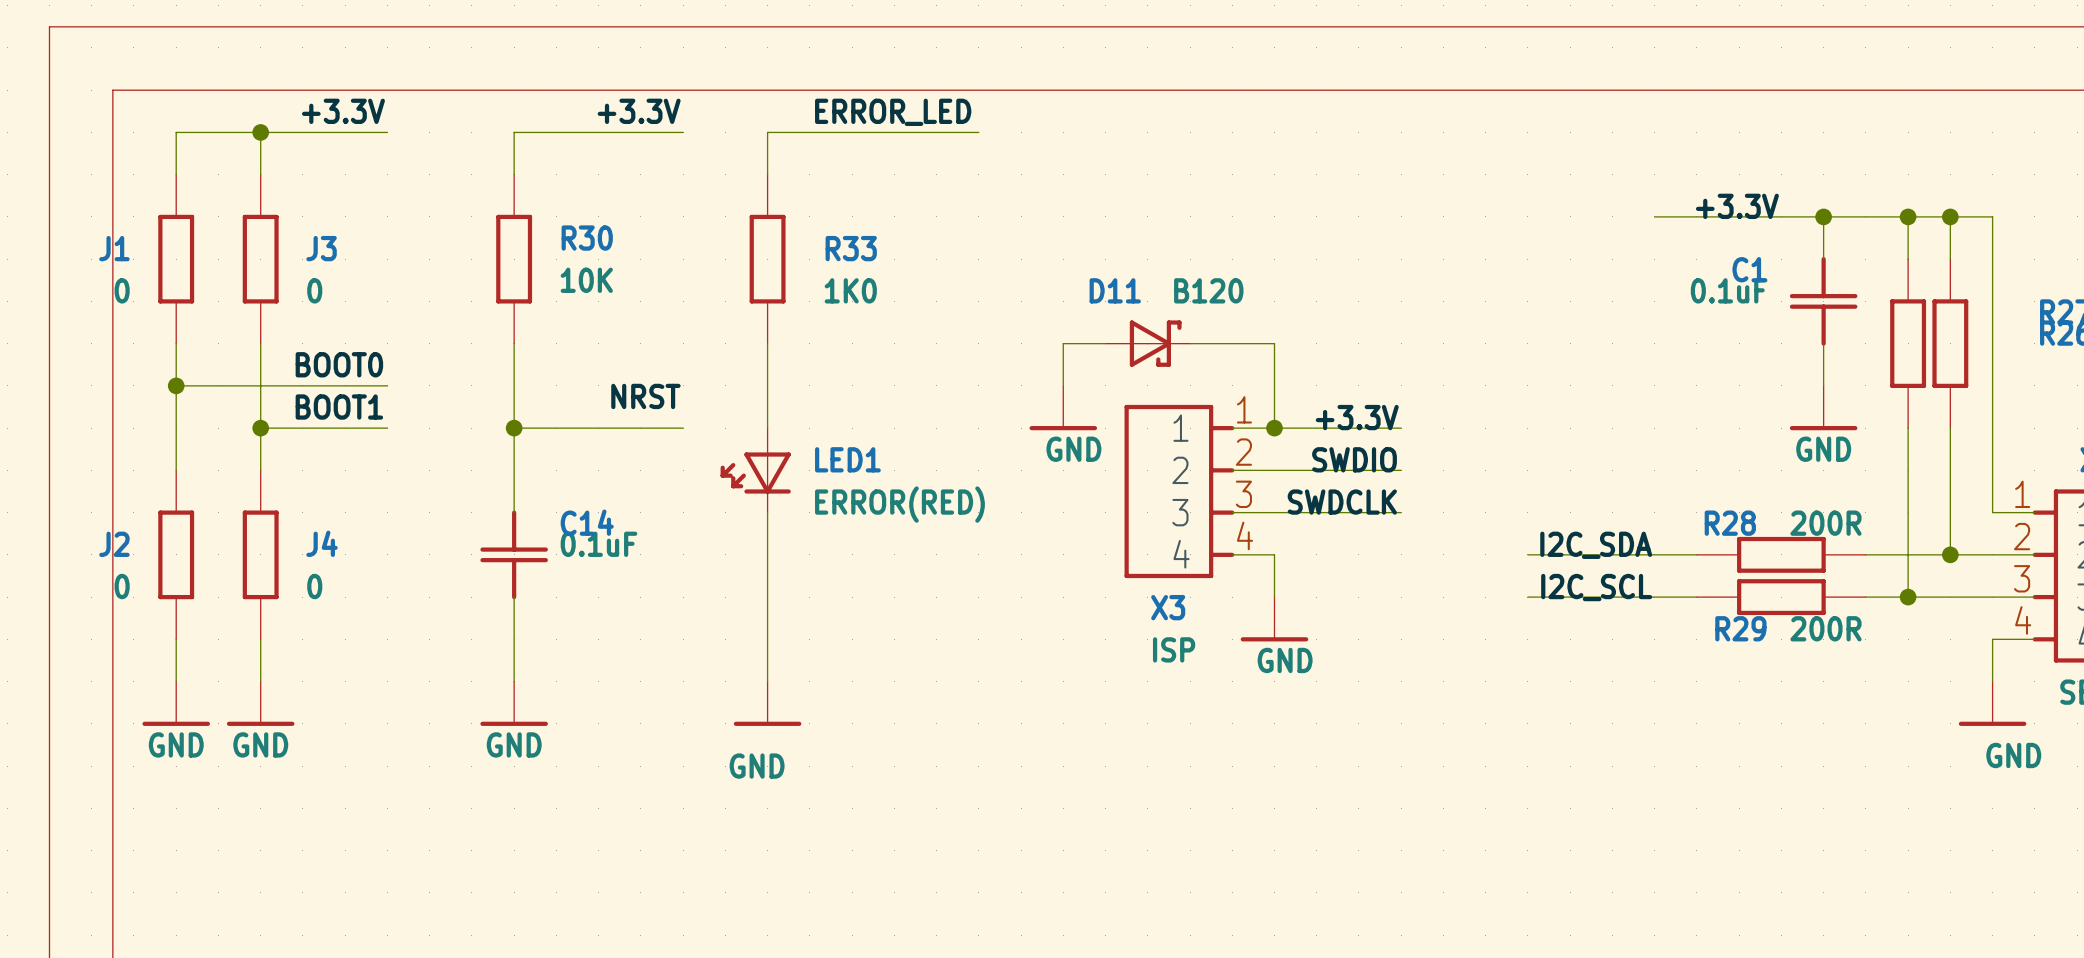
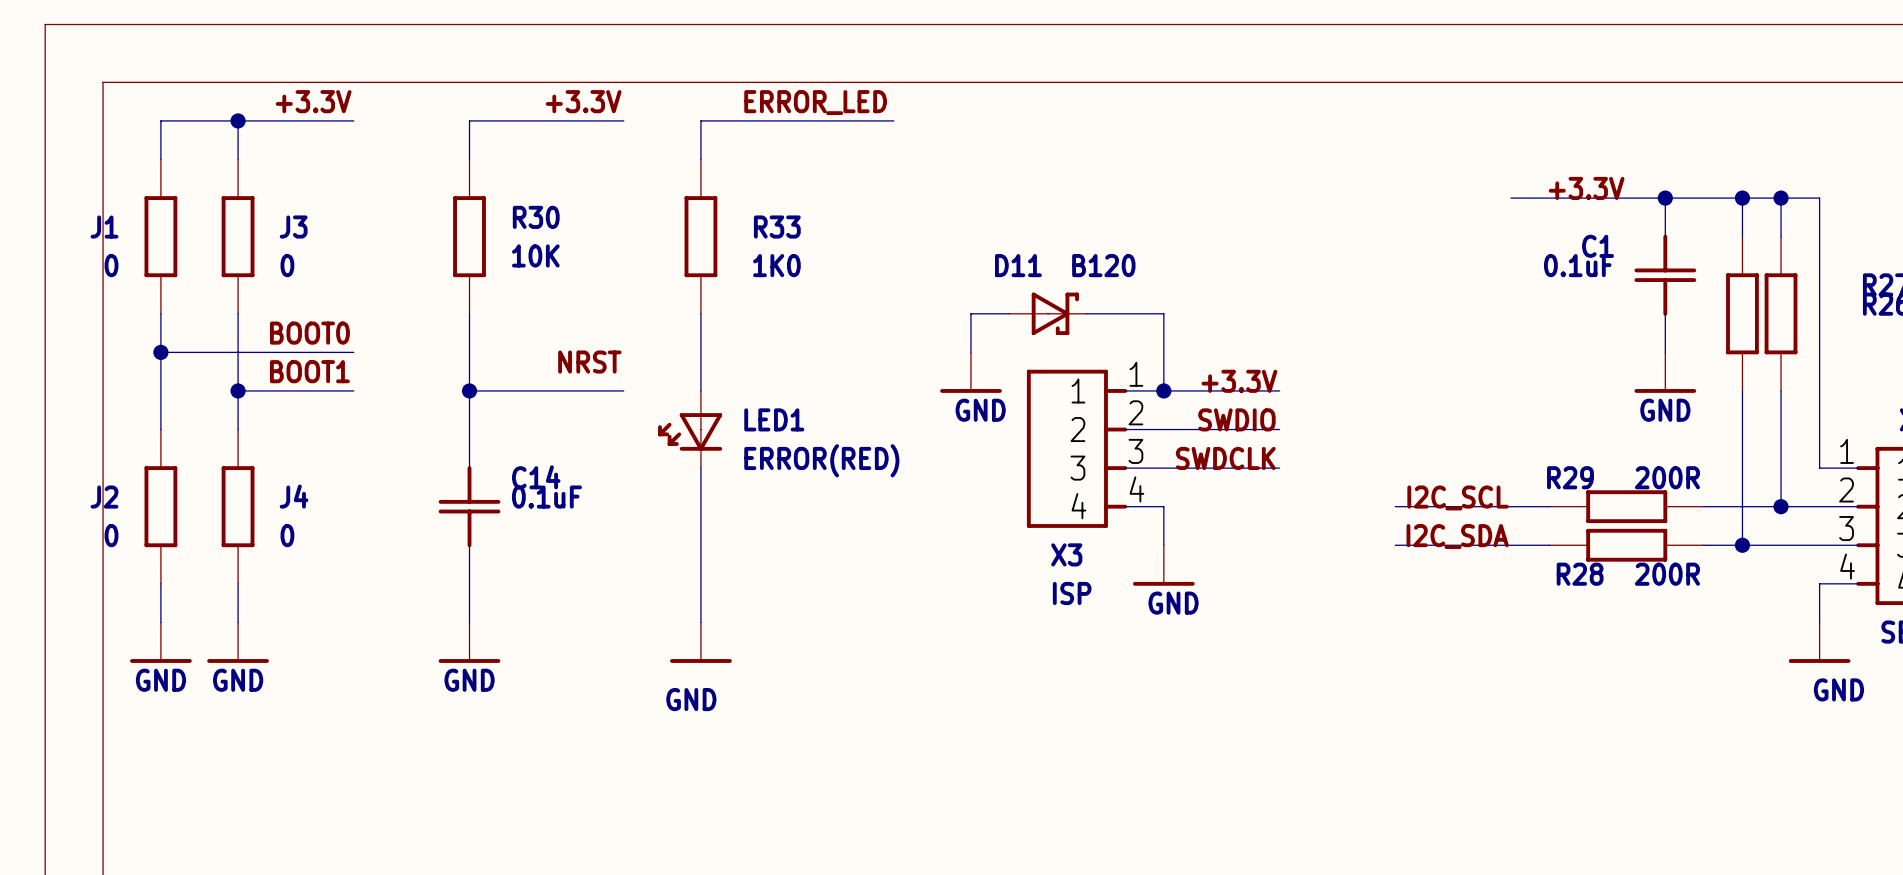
R28 name: R28 (1730, 523) -> R29 (1570, 477)
label: I2C_SDA (1596, 545) -> I2C_SCL (1458, 497)
label: I2C_SCL (1596, 587) -> I2C_SDA (1457, 536)
R29 name: R29 (1740, 628) -> R28 (1580, 574)

